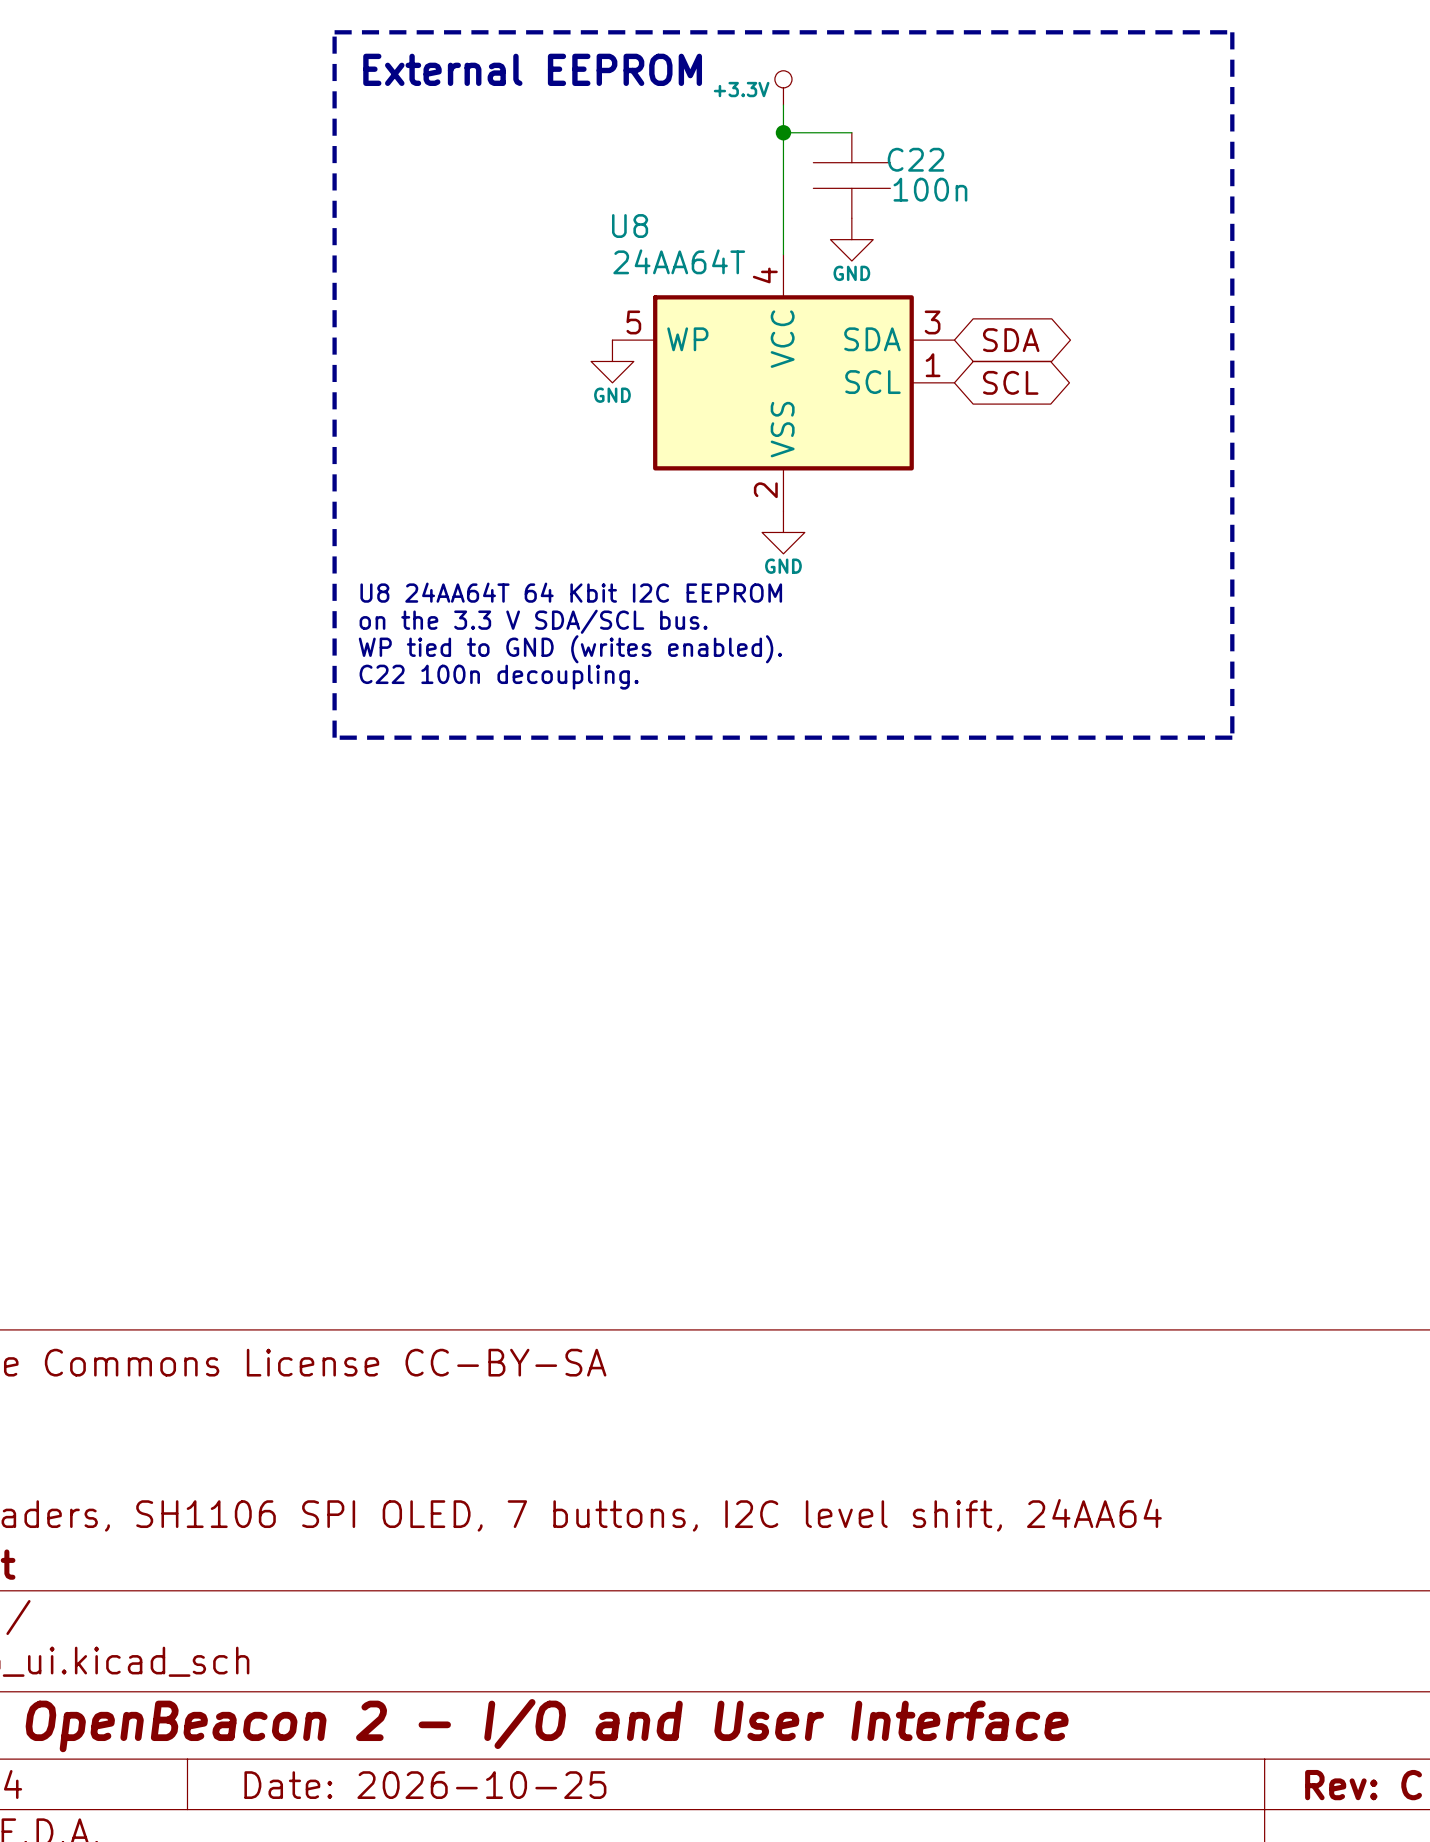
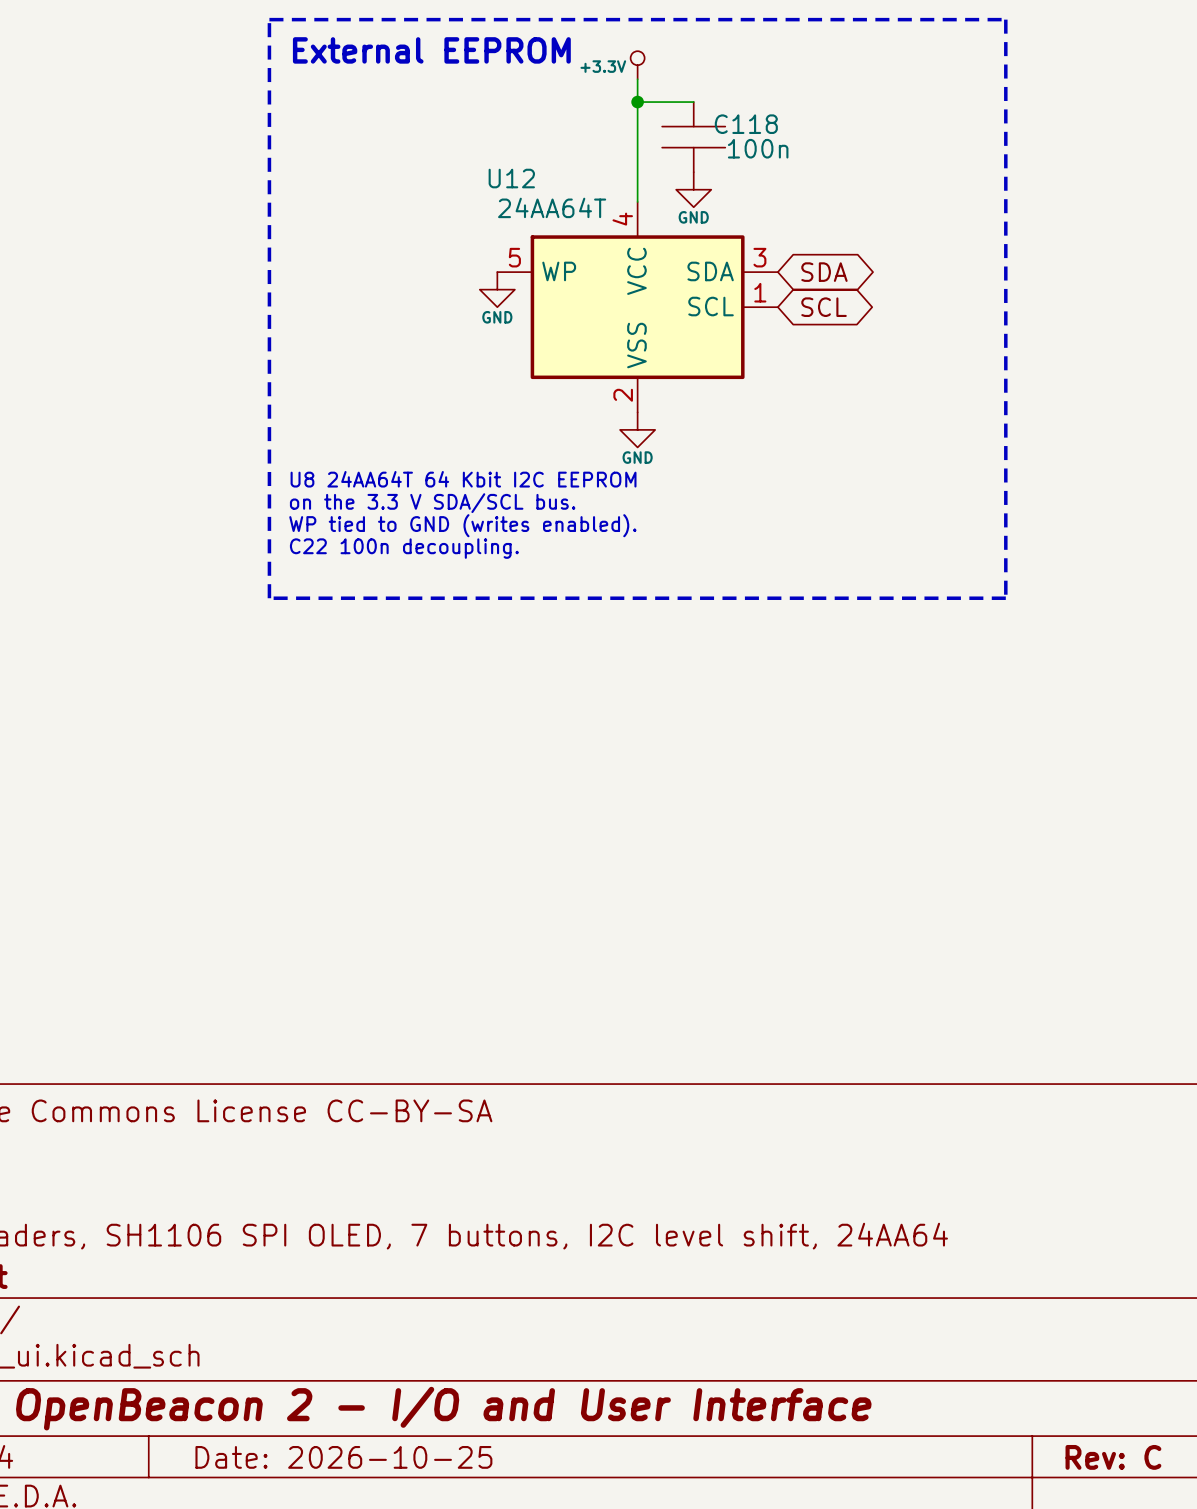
C22 name: C22 (915, 159) -> C118 (746, 124)
U8 name: U8 (630, 226) -> U12 (511, 178)

